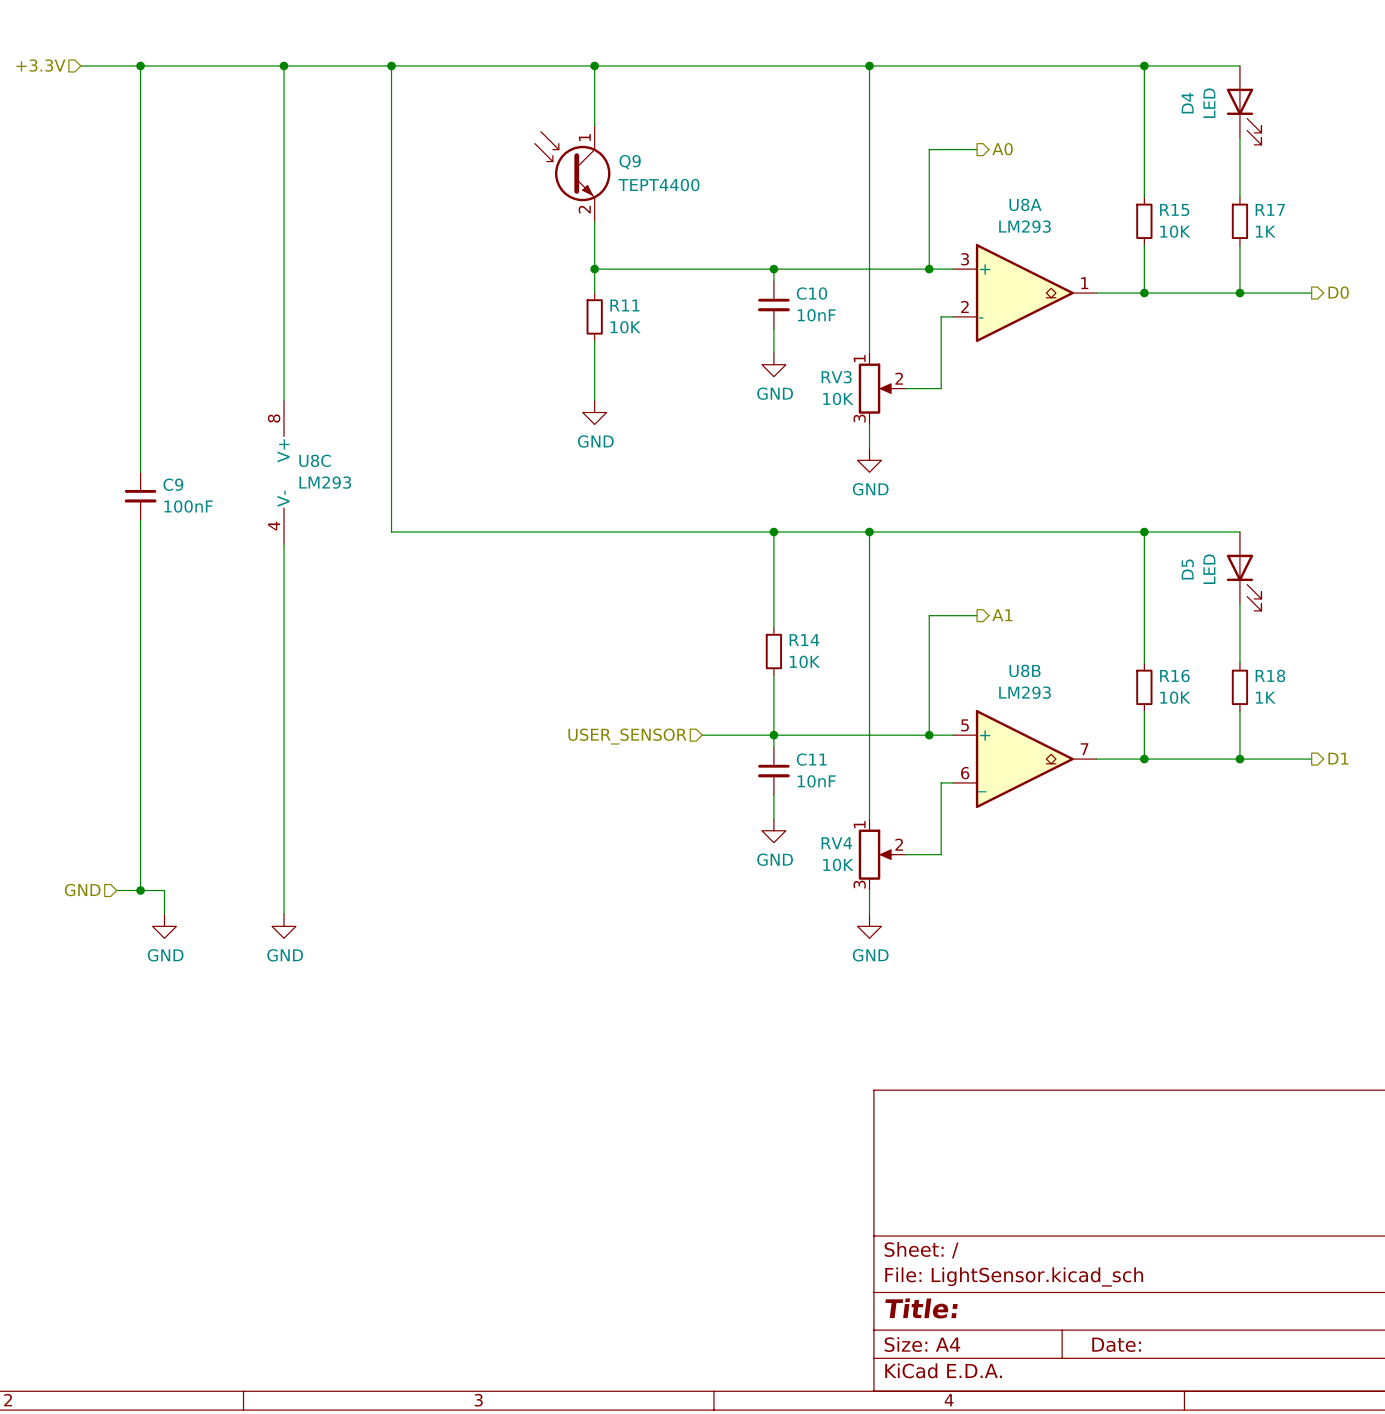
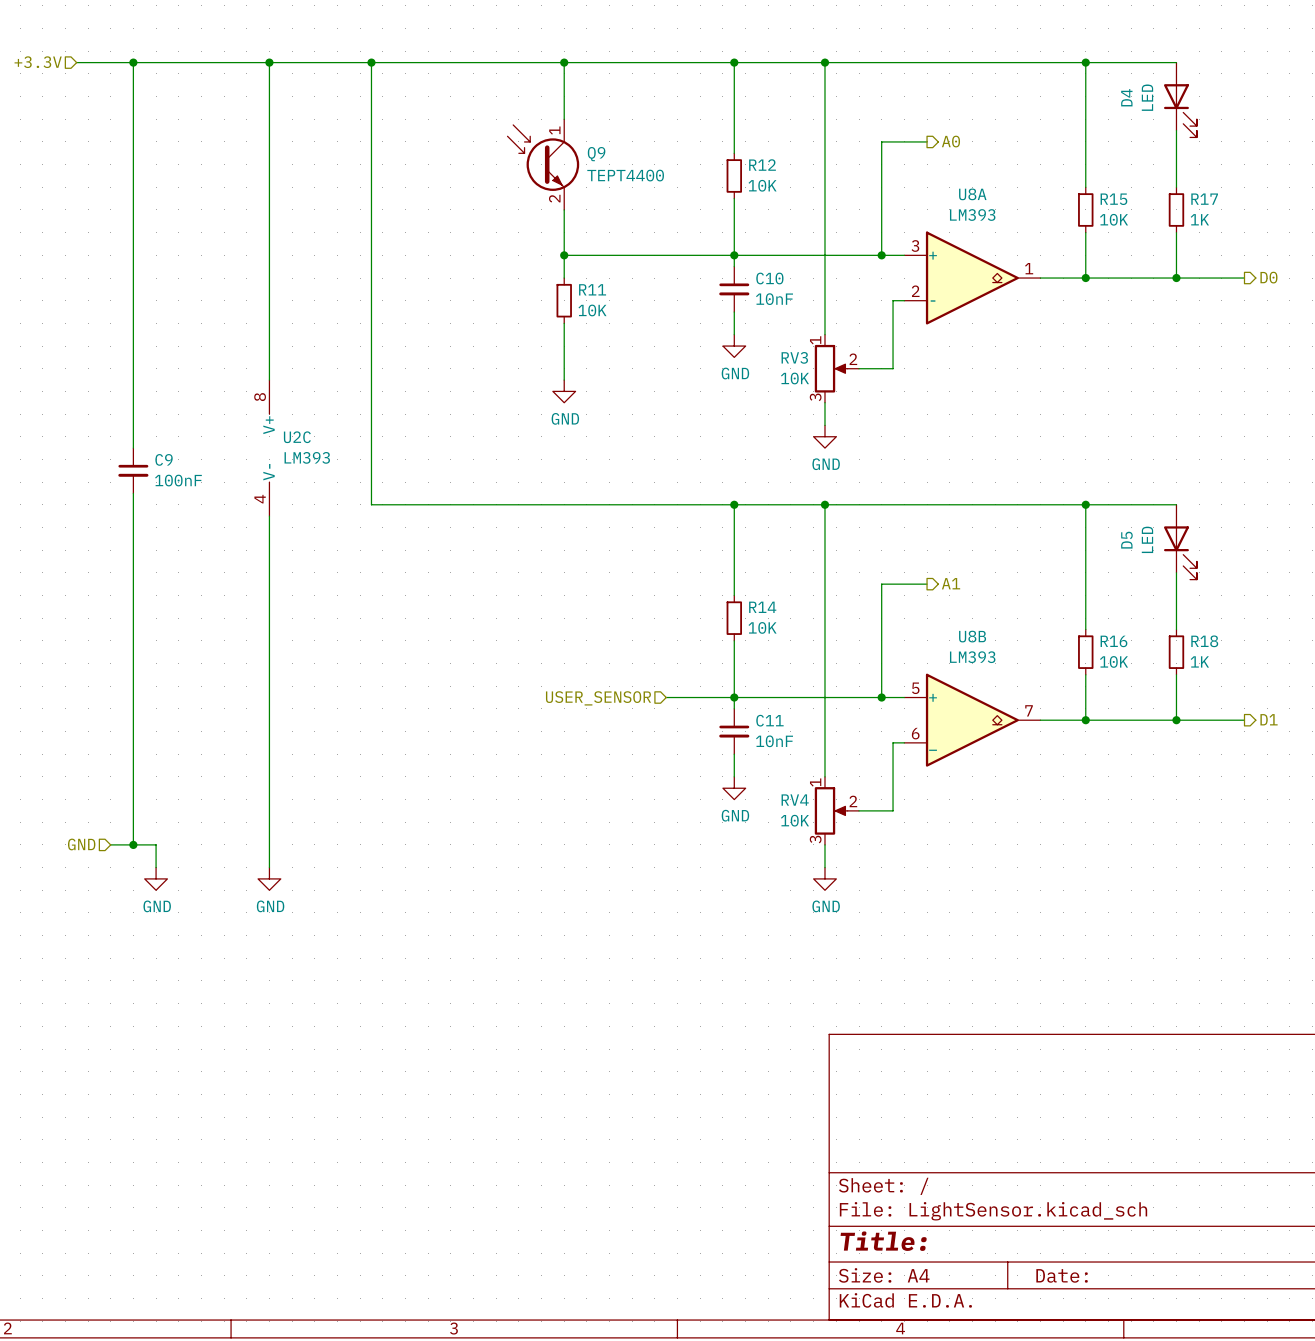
wire: none -> (734, 62) (734, 153)
junction: none -> (734, 62)
R12: none -> 10K (734, 175)
wire: none -> (734, 198) (734, 255)
U8A value: LM293 (1025, 226) -> LM393 (972, 215)
U8C name: U8C (315, 460) -> U2C (297, 437)
U8C value: LM293 (325, 482) -> LM393 (307, 457)
U8B value: LM293 (1025, 692) -> LM393 (972, 657)

